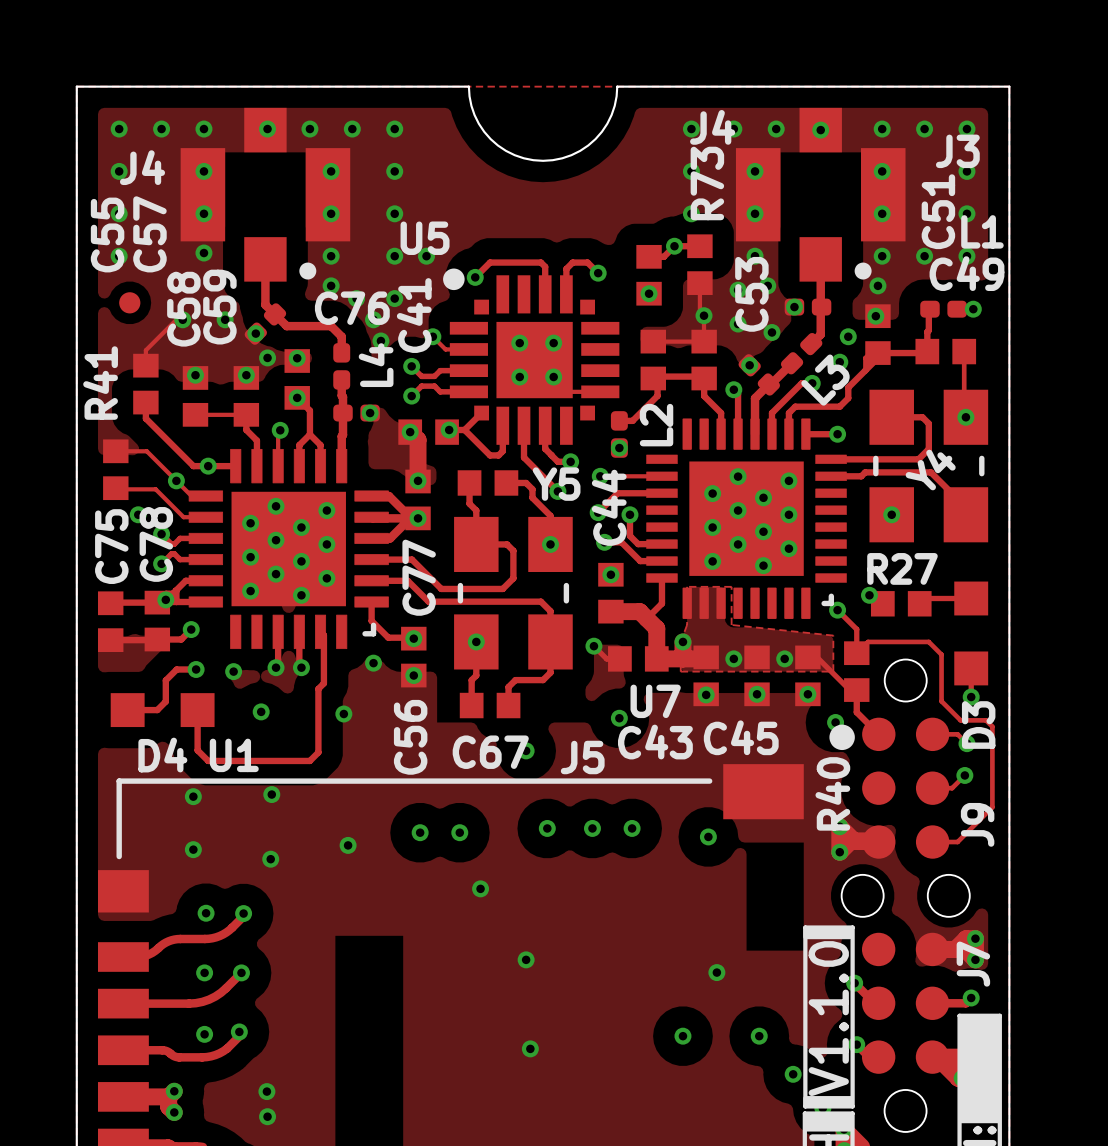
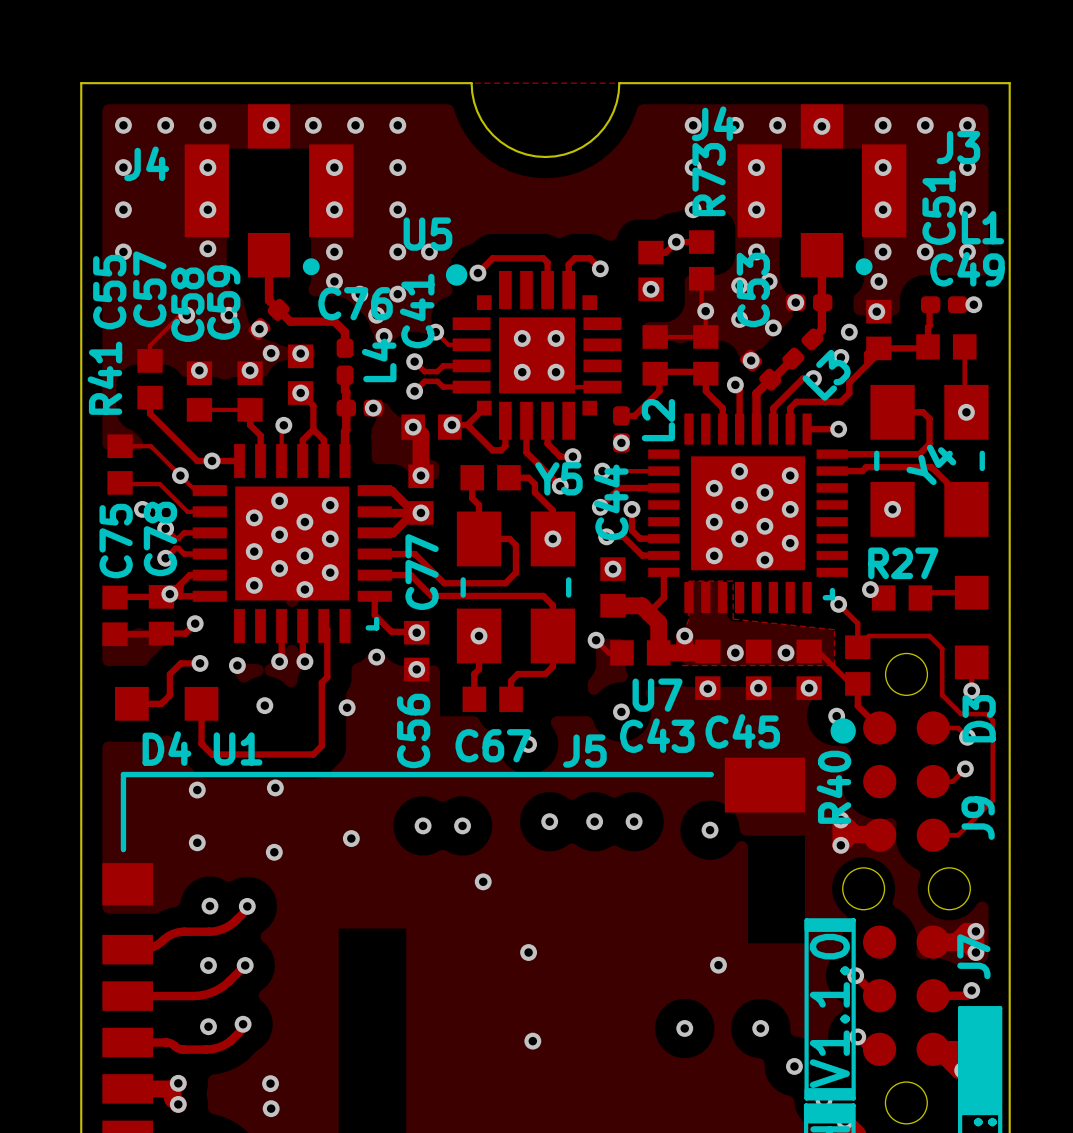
C57 name position: C57 (149, 234) -> C57 (149, 289)
C55 name position: C55 (107, 235) -> C55 (109, 292)
part: (129, 302) -> none

